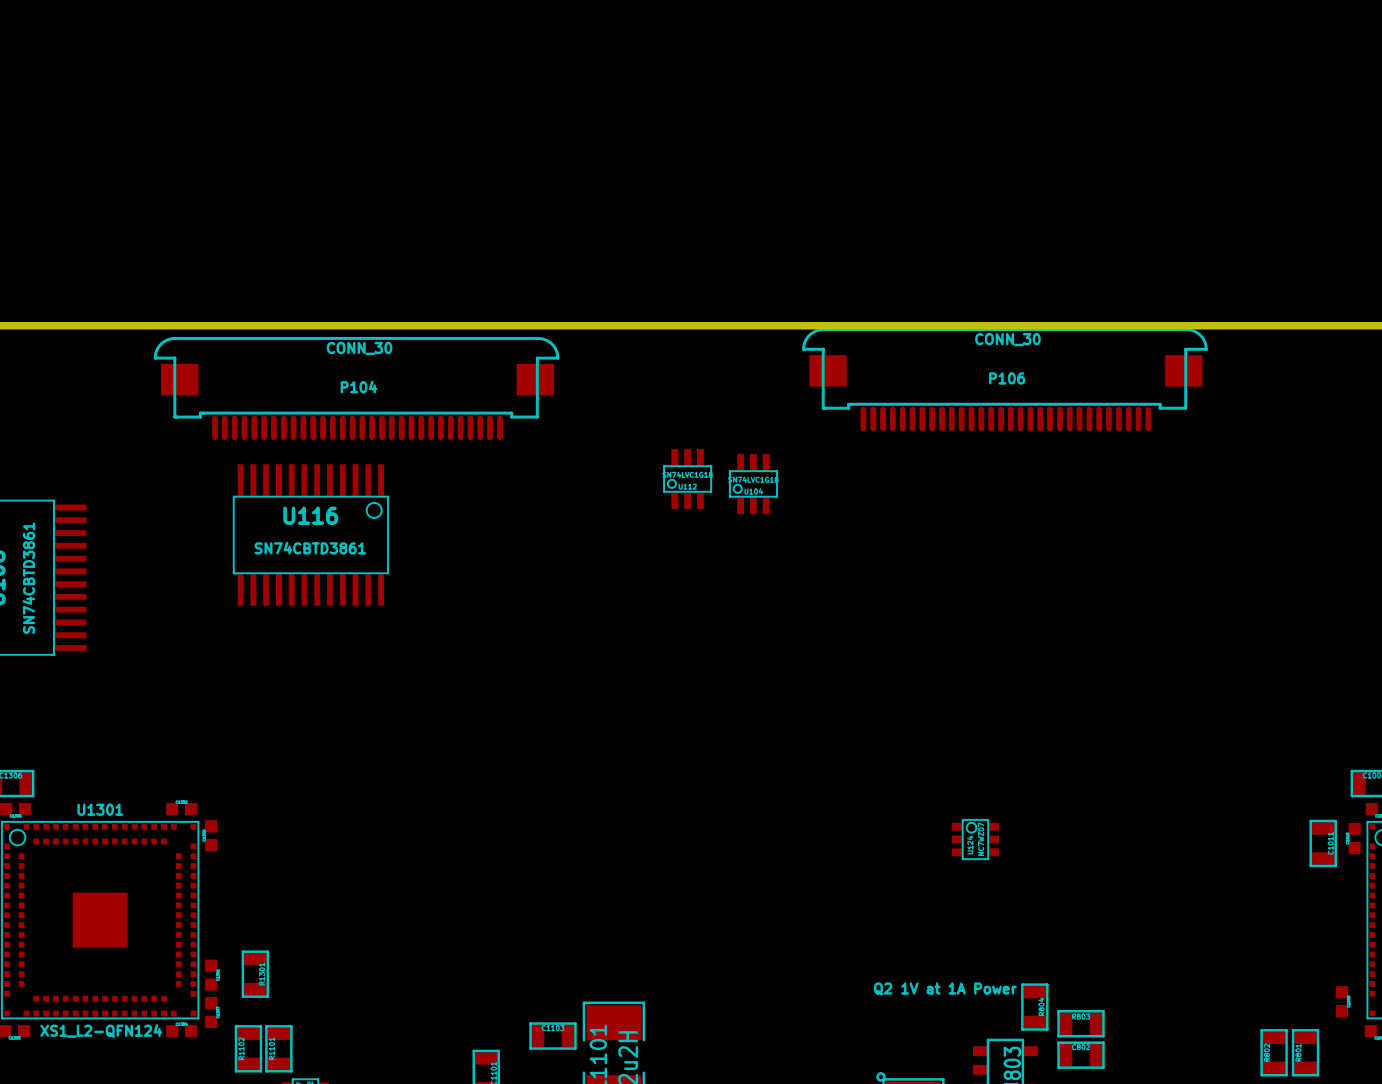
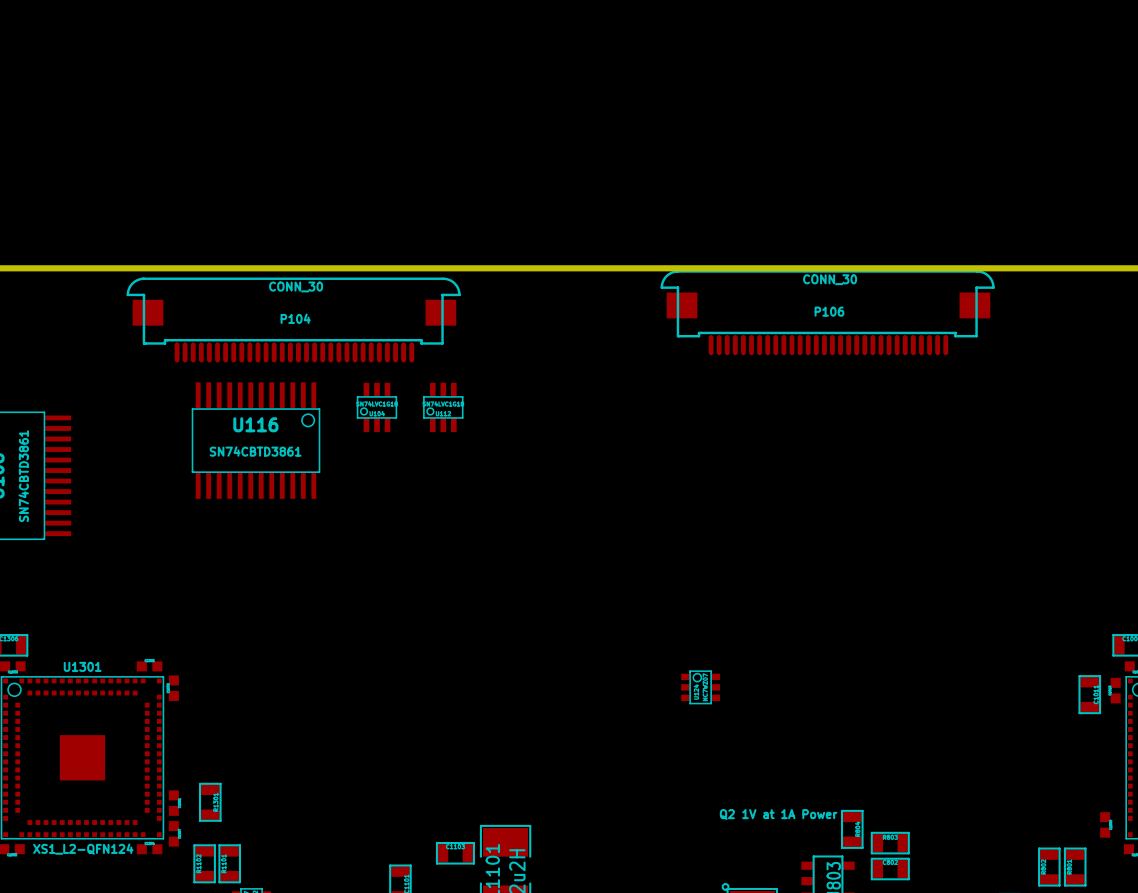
part position: (687, 478) -> (443, 407)
part position: (753, 483) -> (376, 407)
part position: (975, 839) -> (700, 687)

